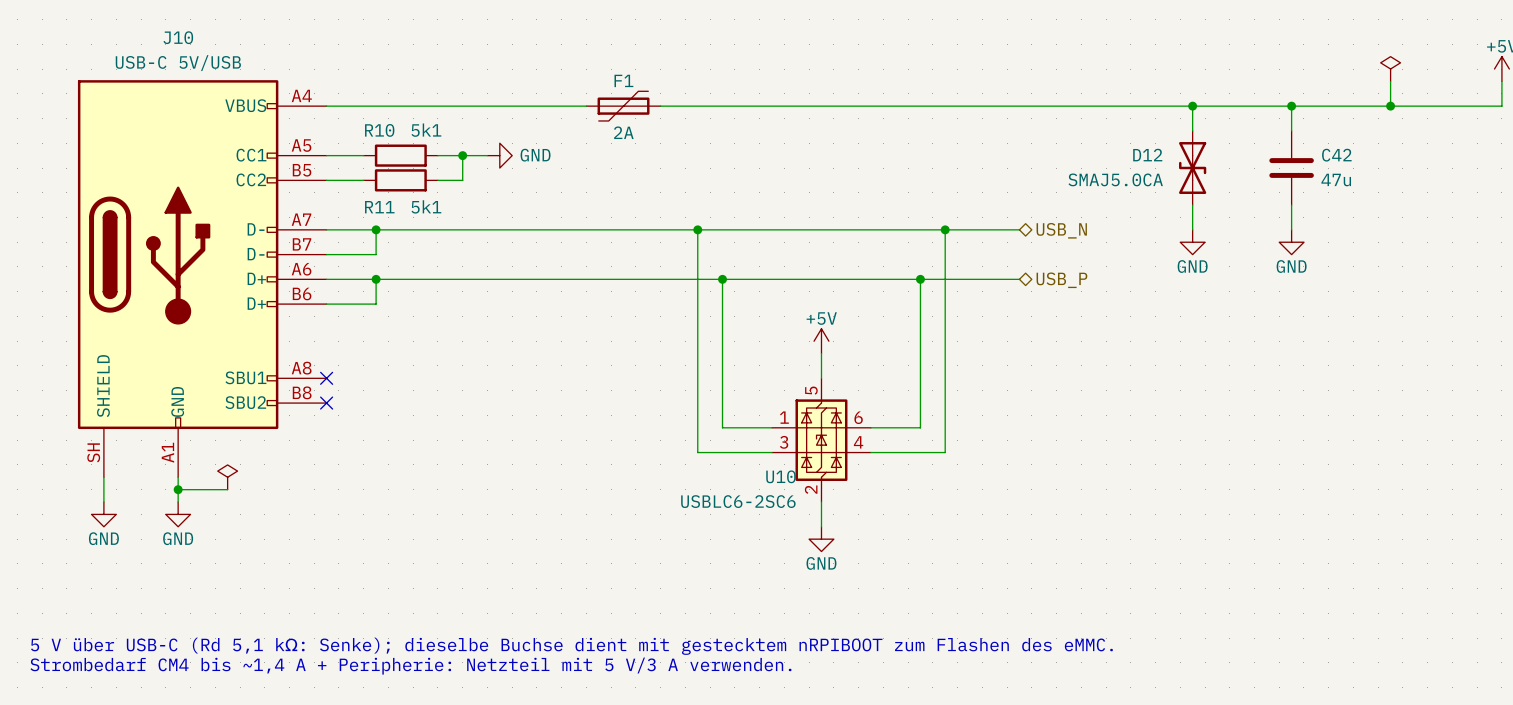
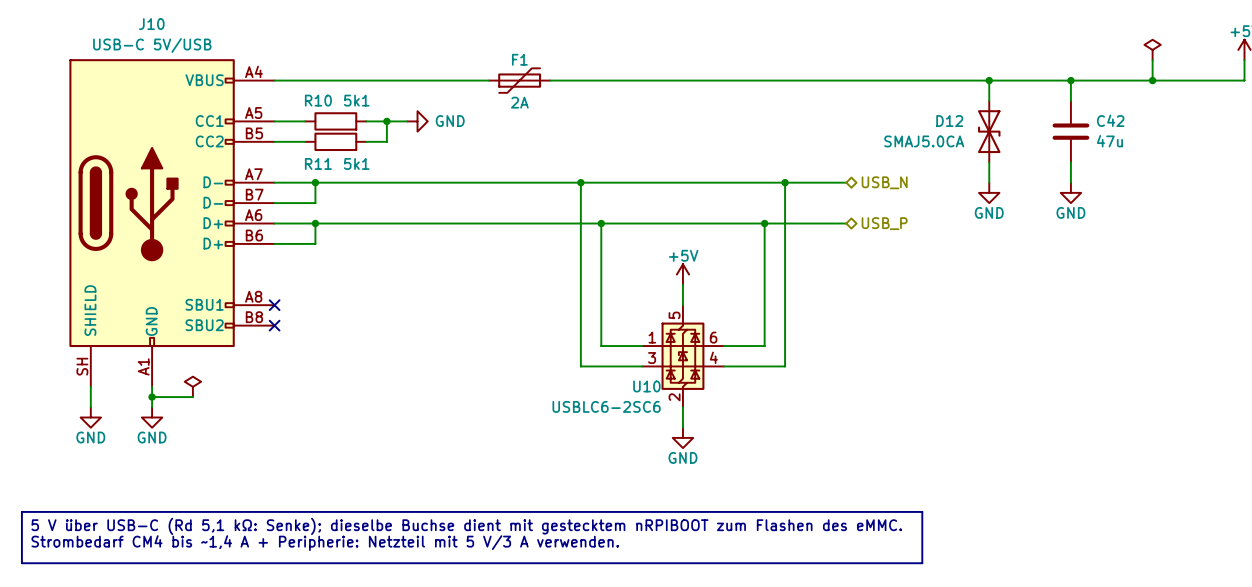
line: none -> (21, 511) (922, 511) (922, 563) (21, 563) (21, 511)

